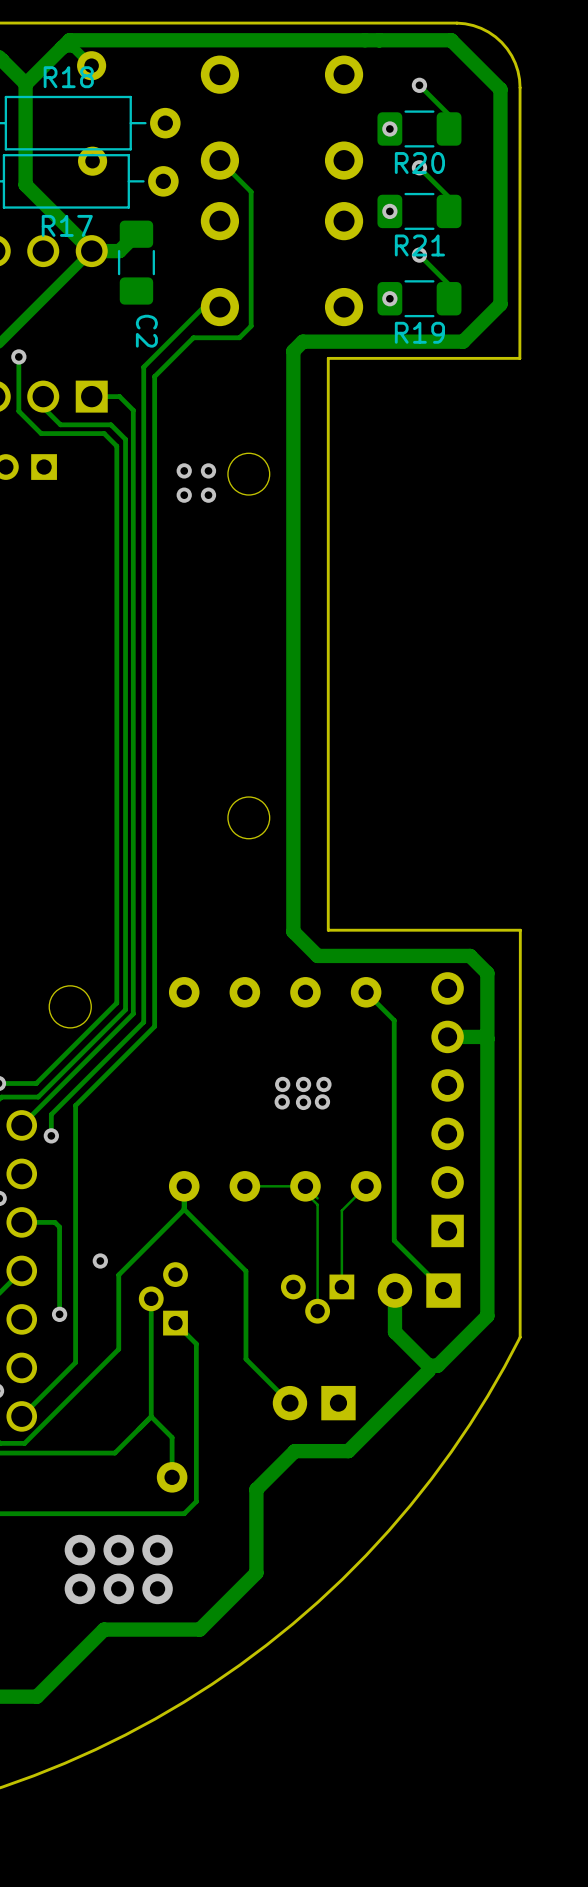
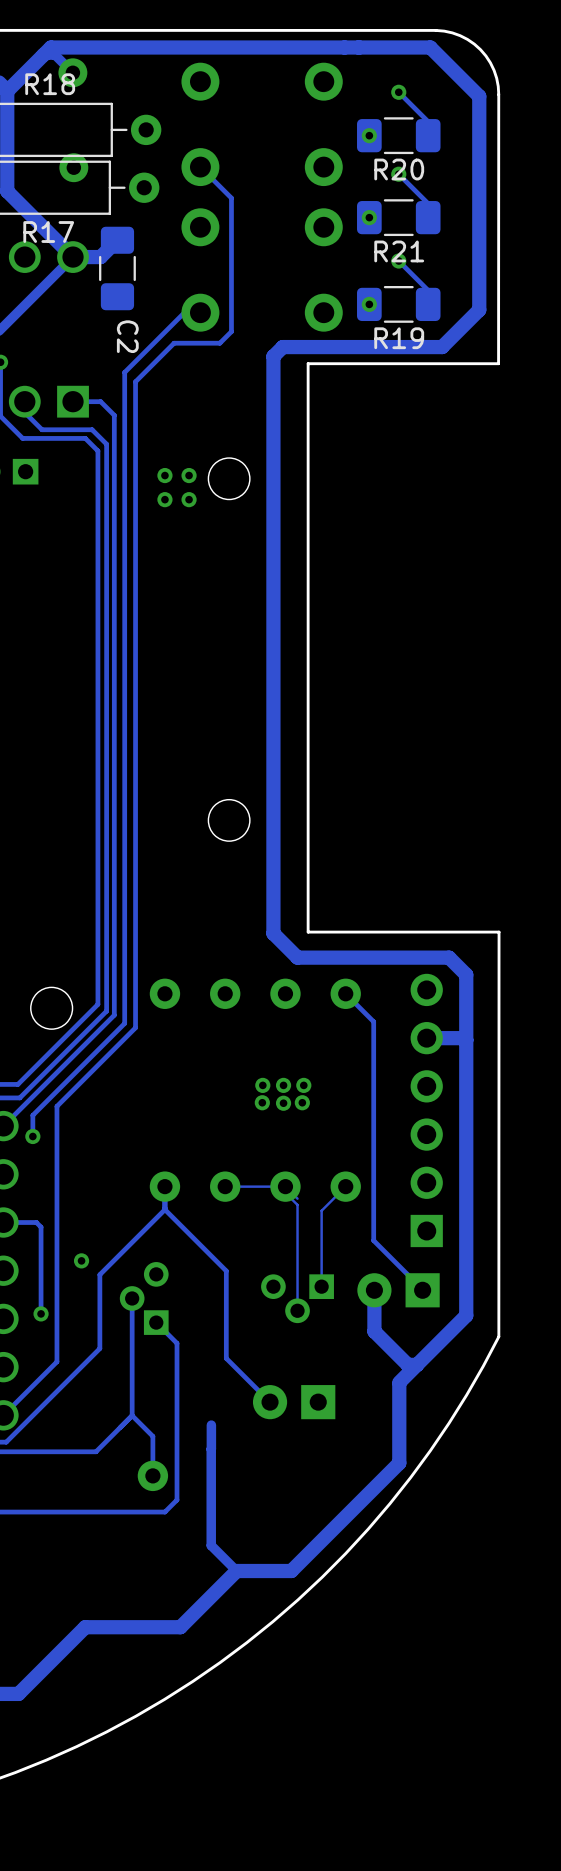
track: (428, 1365) (428, 1370) (348, 1451) (294, 1451) (256, 1489) (256, 1573) -> none
track: none -> (416, 1364) (399, 1382) (399, 1463) (291, 1571) (236, 1571) (211, 1545) (211, 1449)
track: none -> (211, 1425) (211, 1449)
via: (79, 1550) -> none
via: (118, 1550) -> none
via: (157, 1550) -> none
via: (79, 1588) -> none
via: (118, 1588) -> none
via: (157, 1588) -> none

